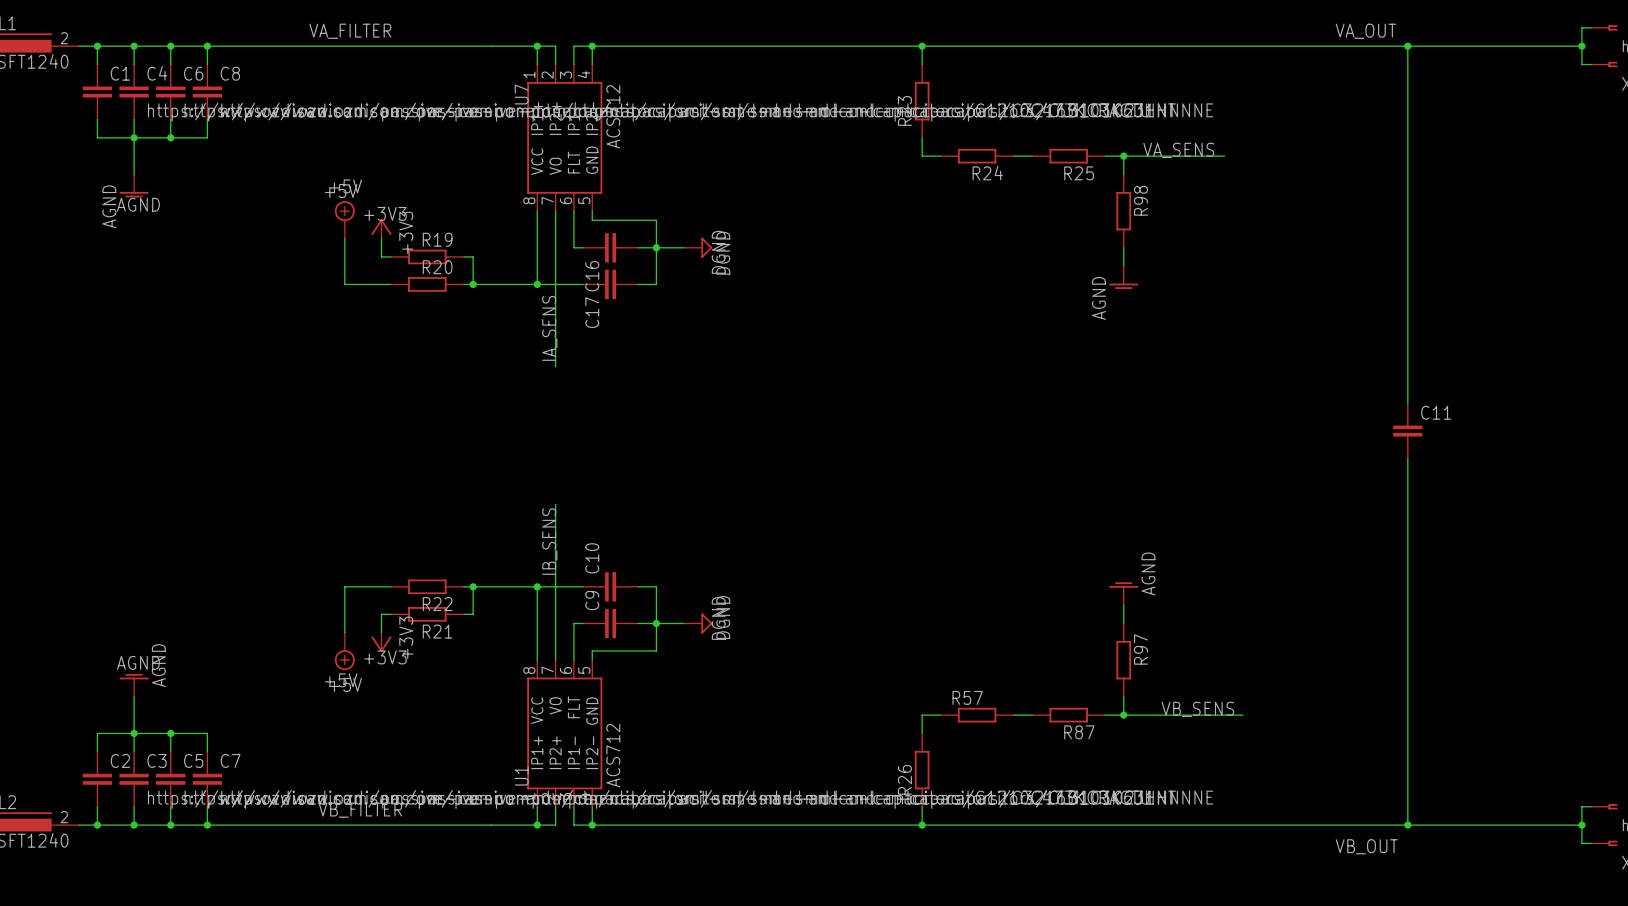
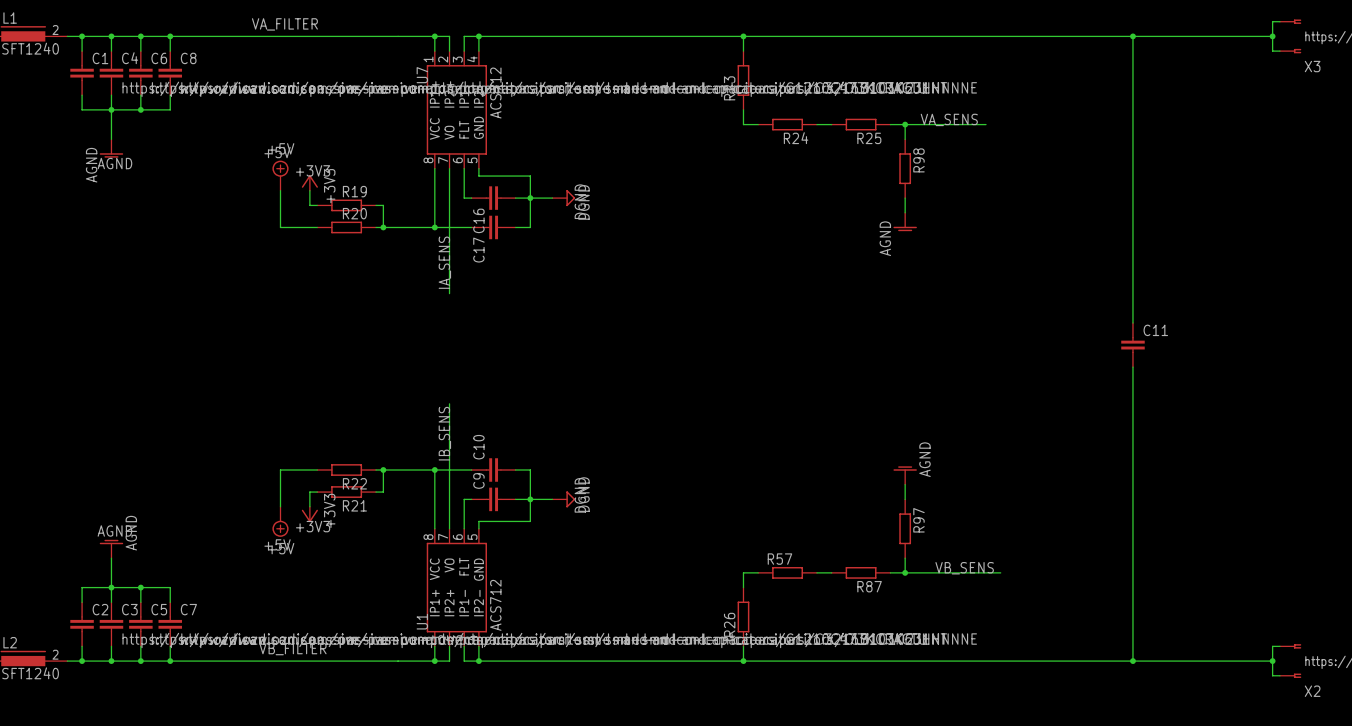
label: VA_OUT (1365, 31) -> none
label: VB_OUT (1366, 846) -> none

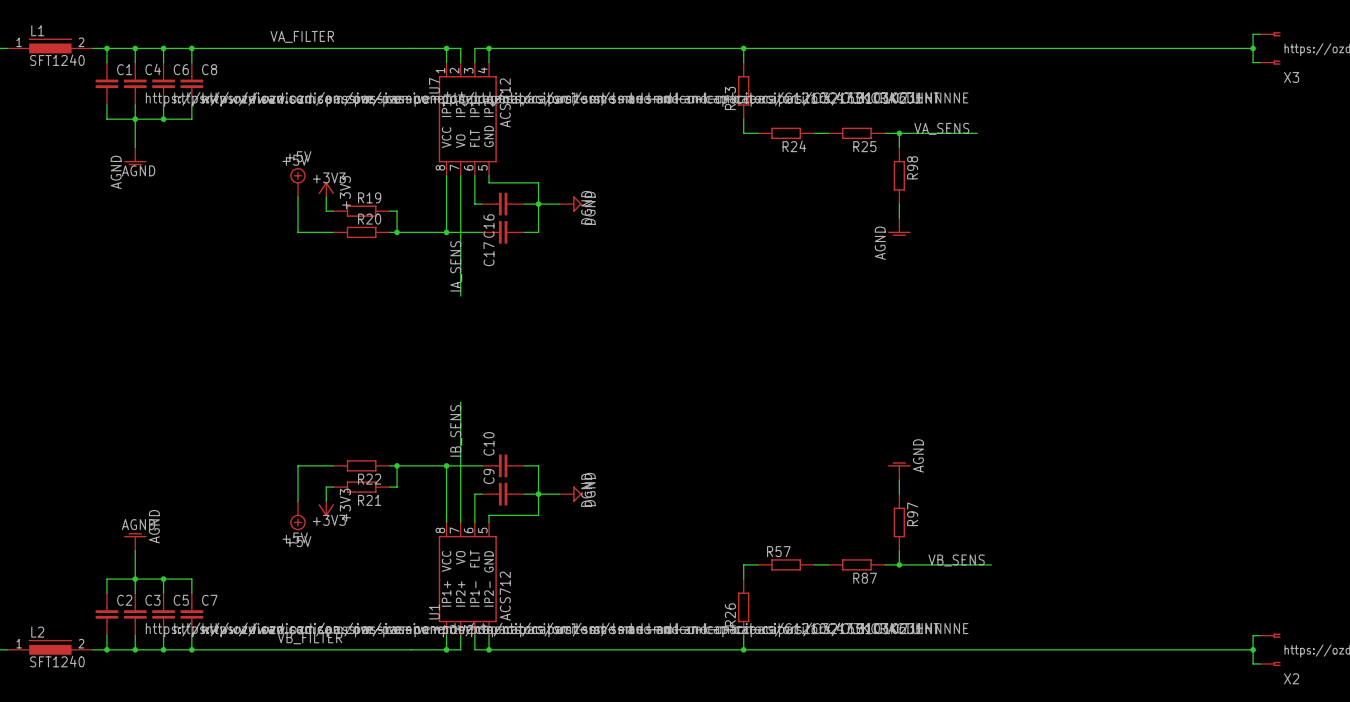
wire: (1132, 36) (1132, 323) -> none
junction: (1132, 36) -> none
C11: (1132, 345) -> none
wire: (1132, 367) (1132, 661) -> none
junction: (1132, 661) -> none

